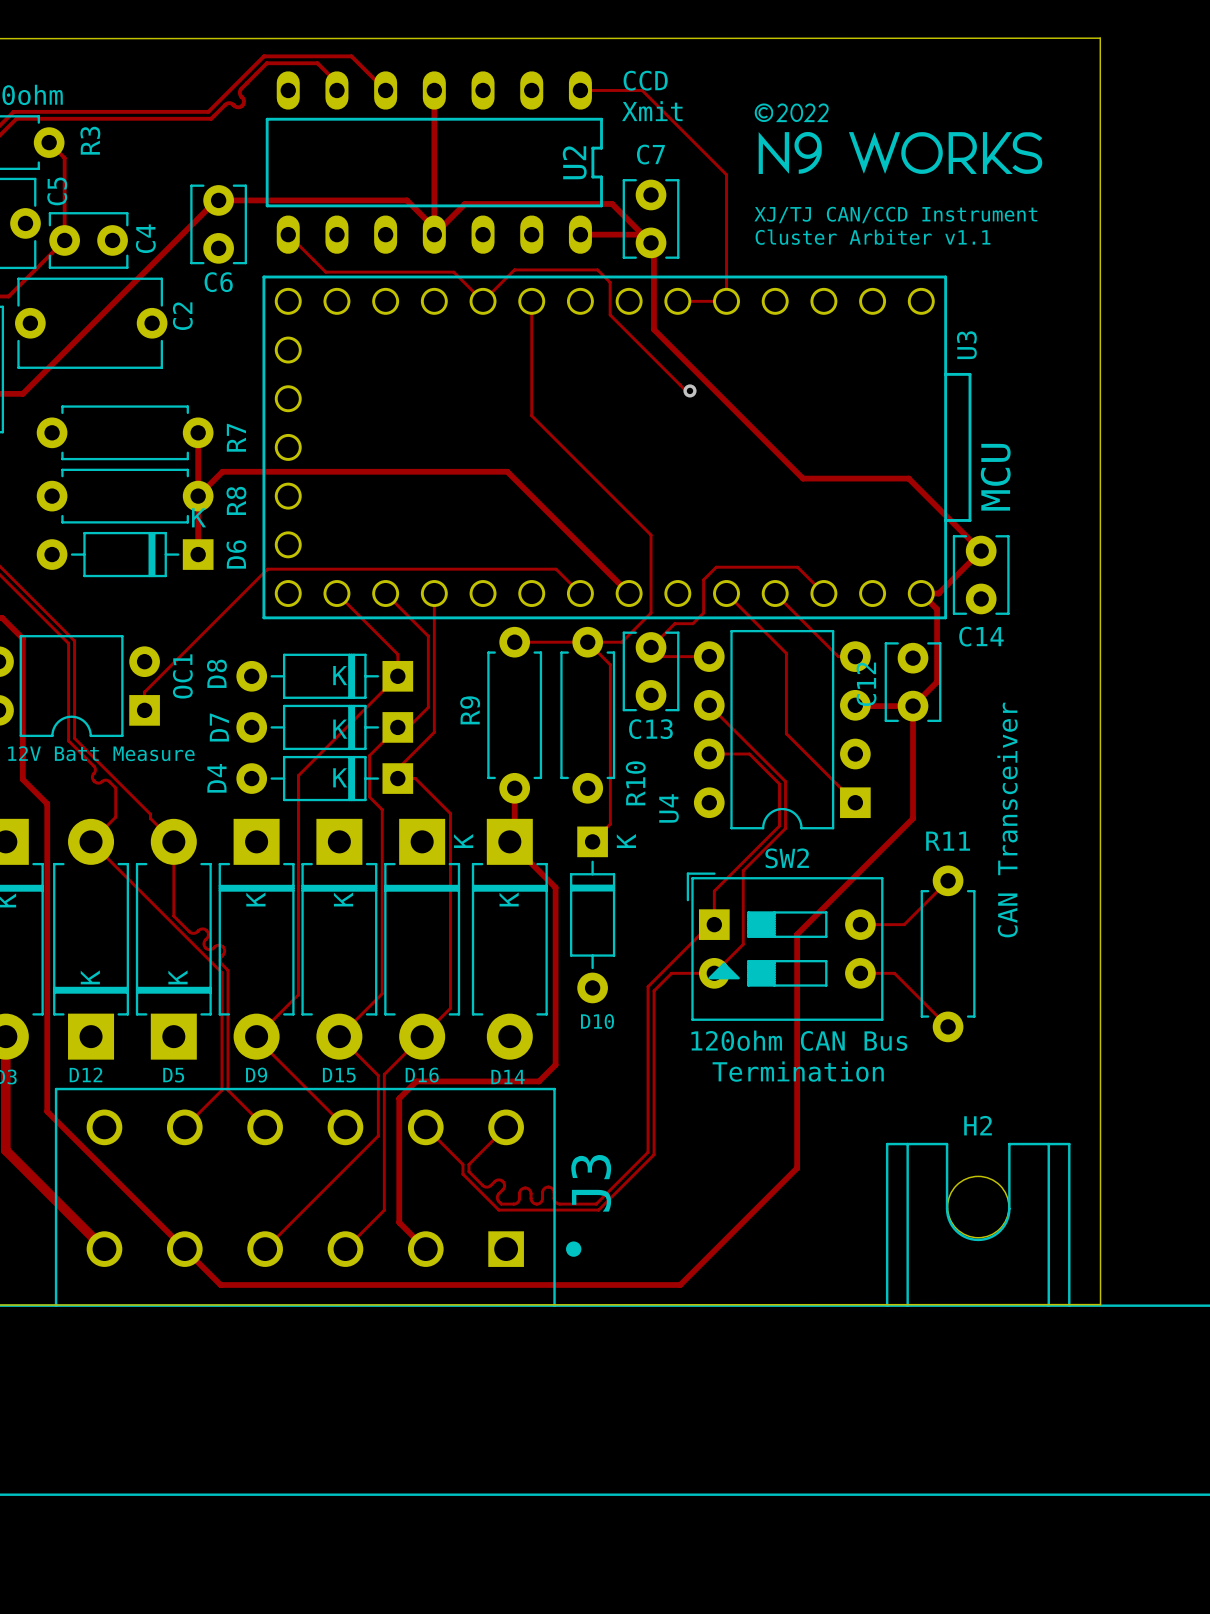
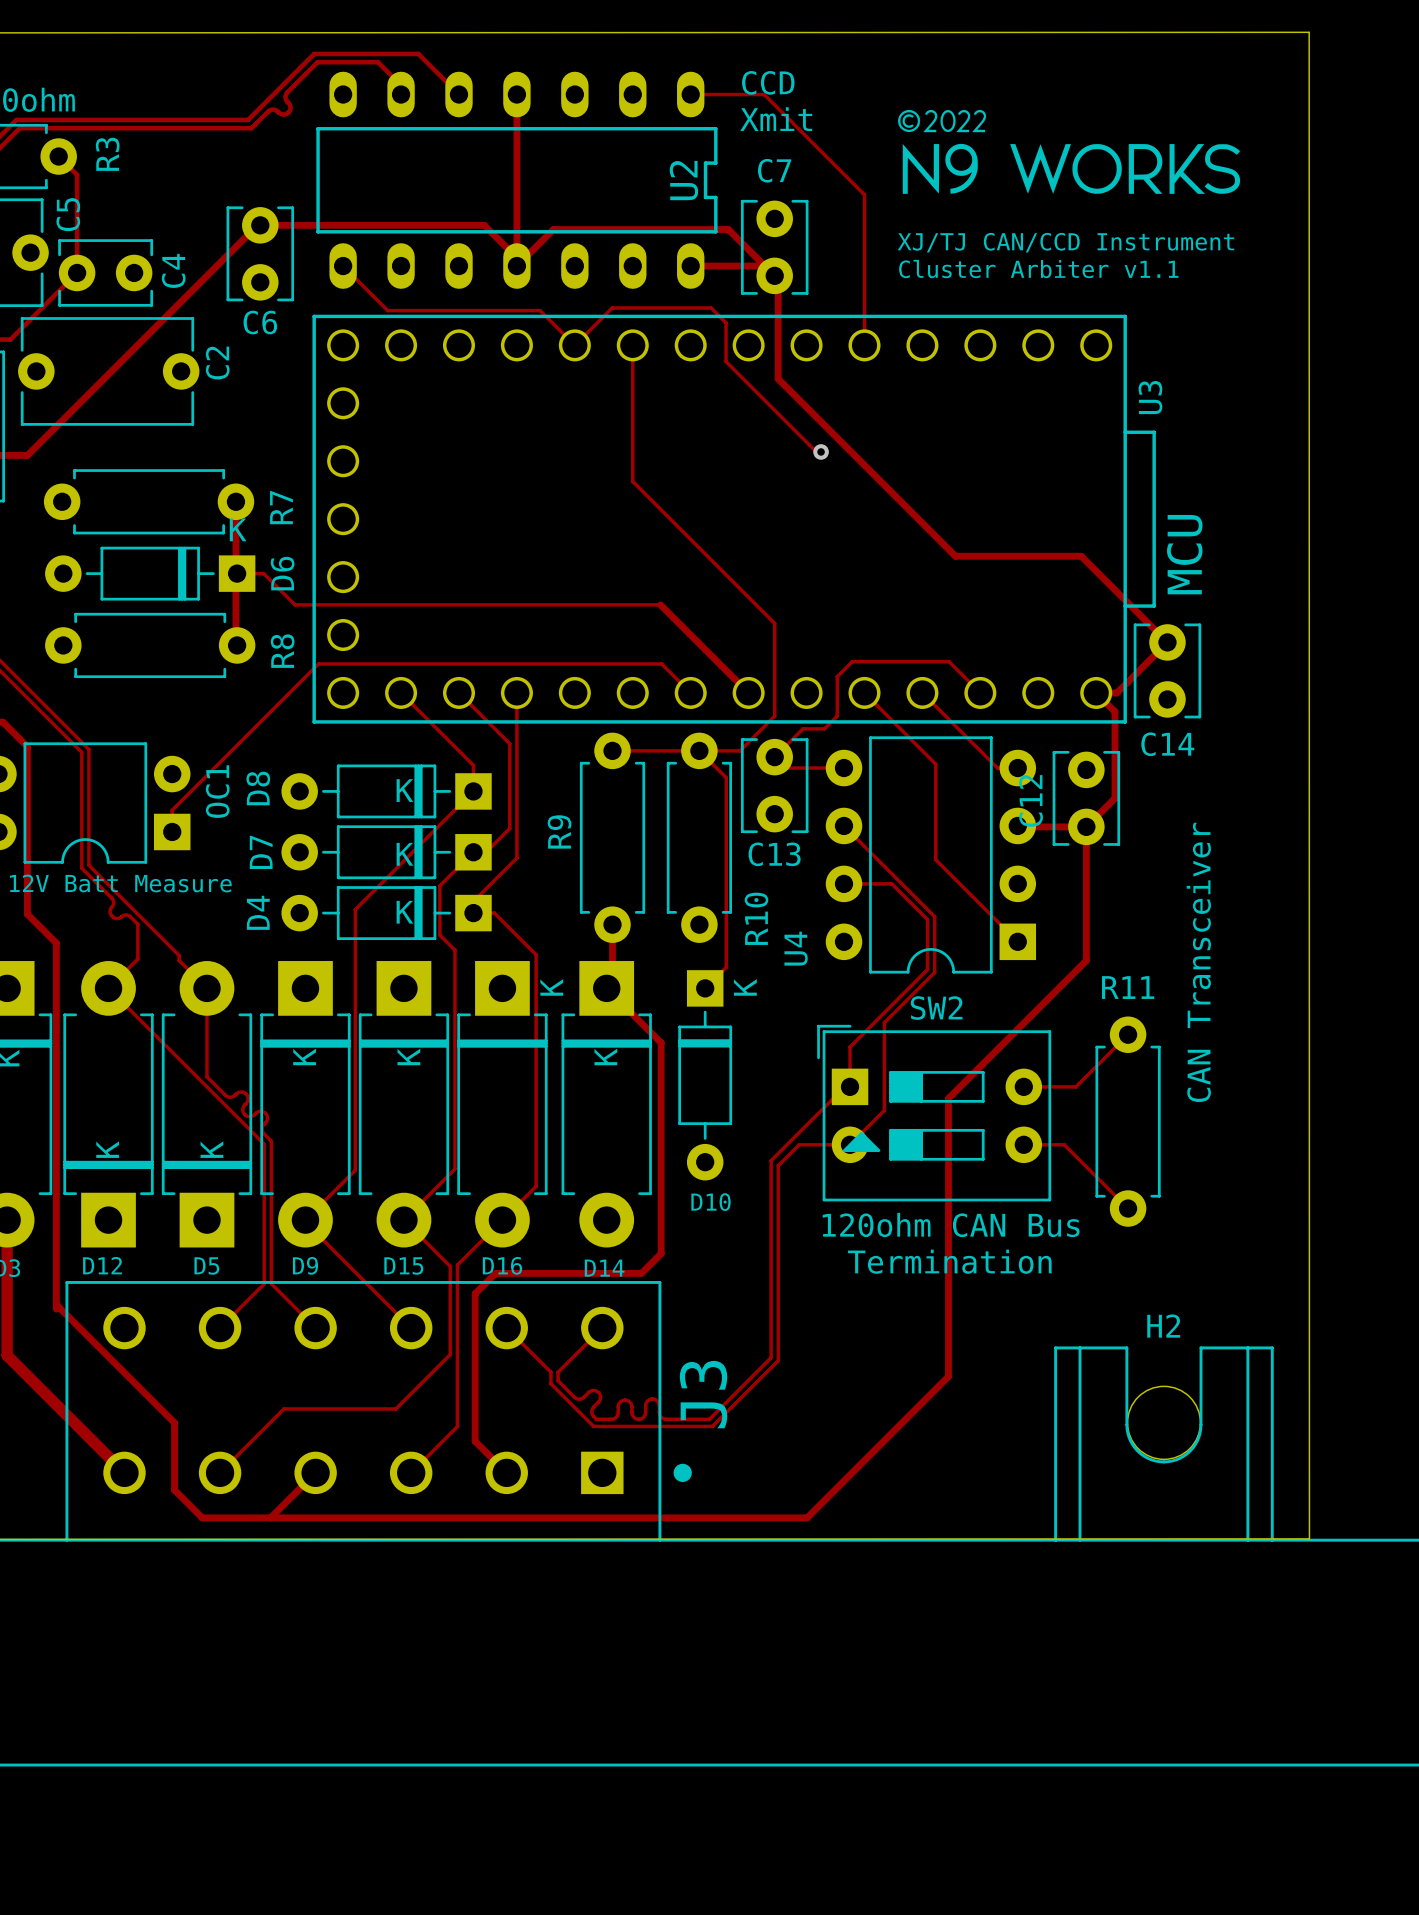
track: (677, 301) (726, 301) -> none
R8 position: (125, 496) -> (150, 645)
track: (198, 496) (222, 471) (507, 471) (555, 519) -> (237, 573) (263, 573) (295, 604) (660, 604)
D6 position: (125, 554) -> (150, 573)
track: (47, 1111) (220, 1284) (680, 1284) -> (56, 1304) (174, 1422) (174, 1490) (202, 1517) (807, 1517) (809, 1515)
track: (378, 1135) (265, 1249) -> (450, 1338) (450, 1354) (395, 1408) (283, 1408) (220, 1472)
track: none -> (307, 1481) (270, 1517)

